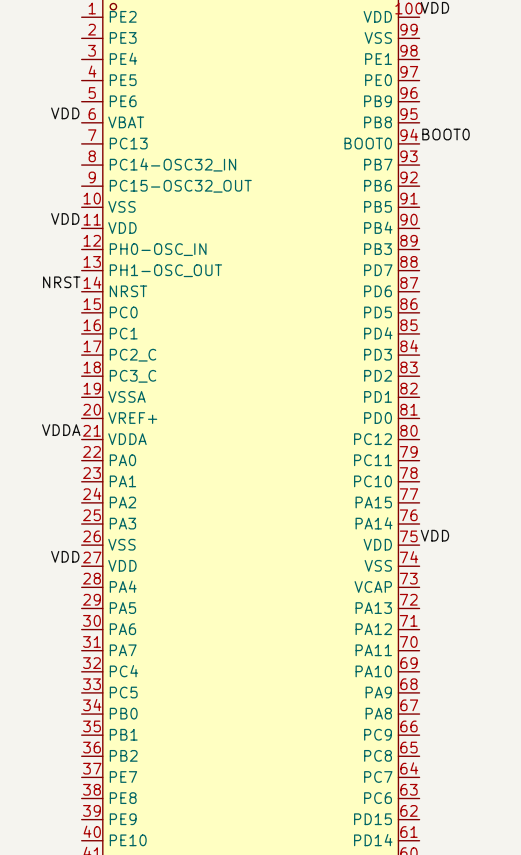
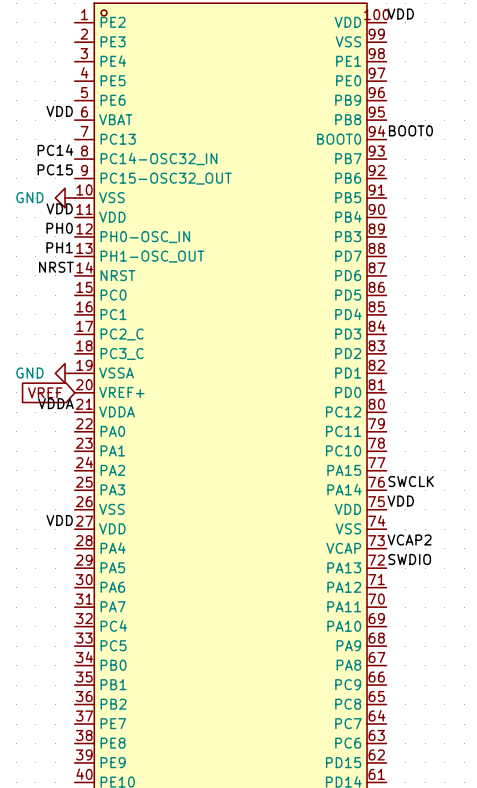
label: none -> PC14 (55, 150)
label: none -> PC15 (55, 169)
power symbol: none -> GND (65, 198)
label: none -> PH0 (59, 228)
label: none -> PH1 (59, 247)
power symbol: none -> GND (65, 373)
global label: none -> VREF (45, 392)
label: none -> SWCLK (411, 481)
label: none -> VCAP2 (409, 539)
label: none -> SWDIO (409, 559)

